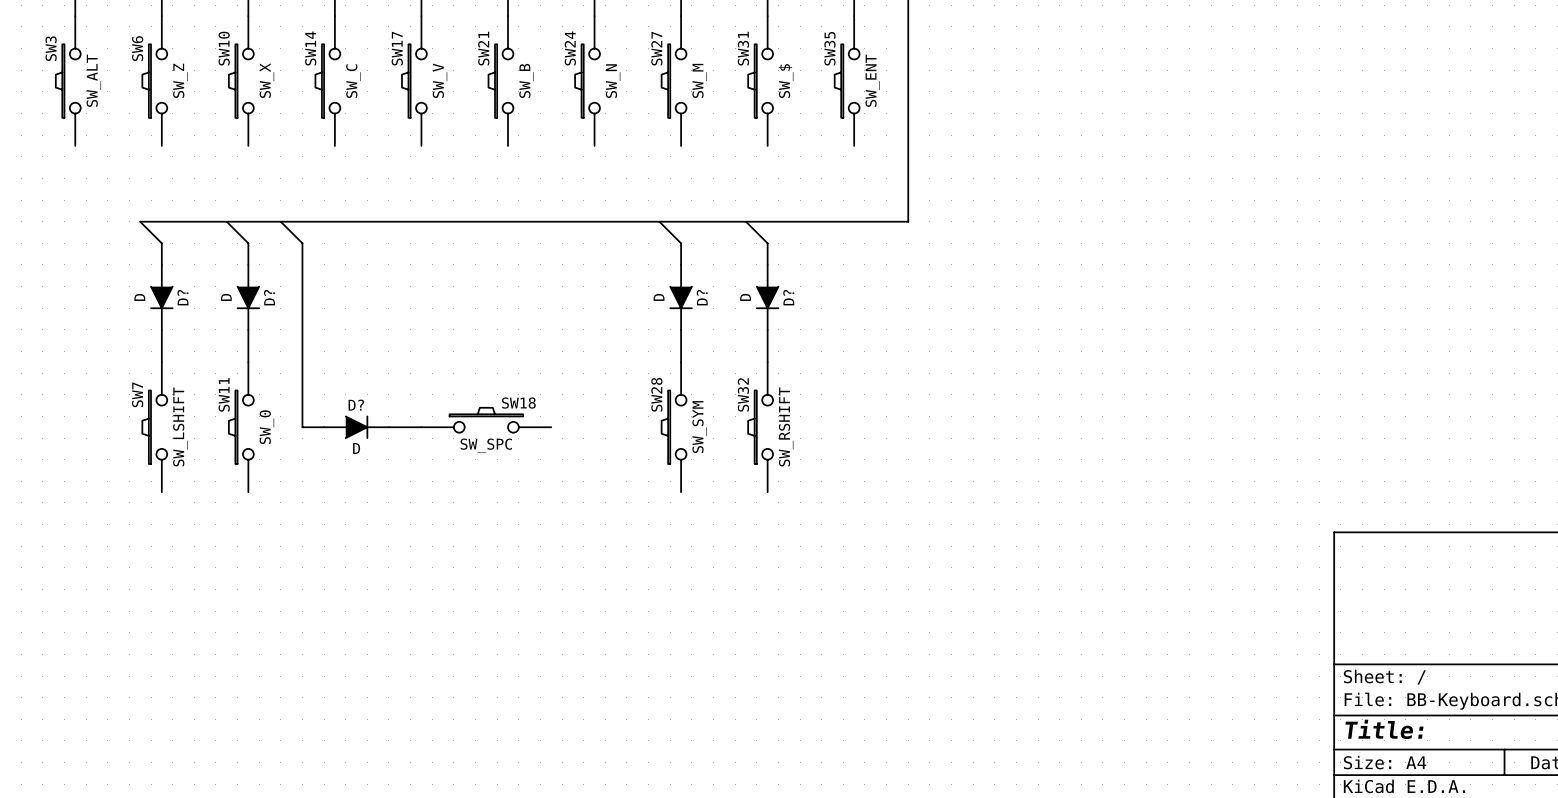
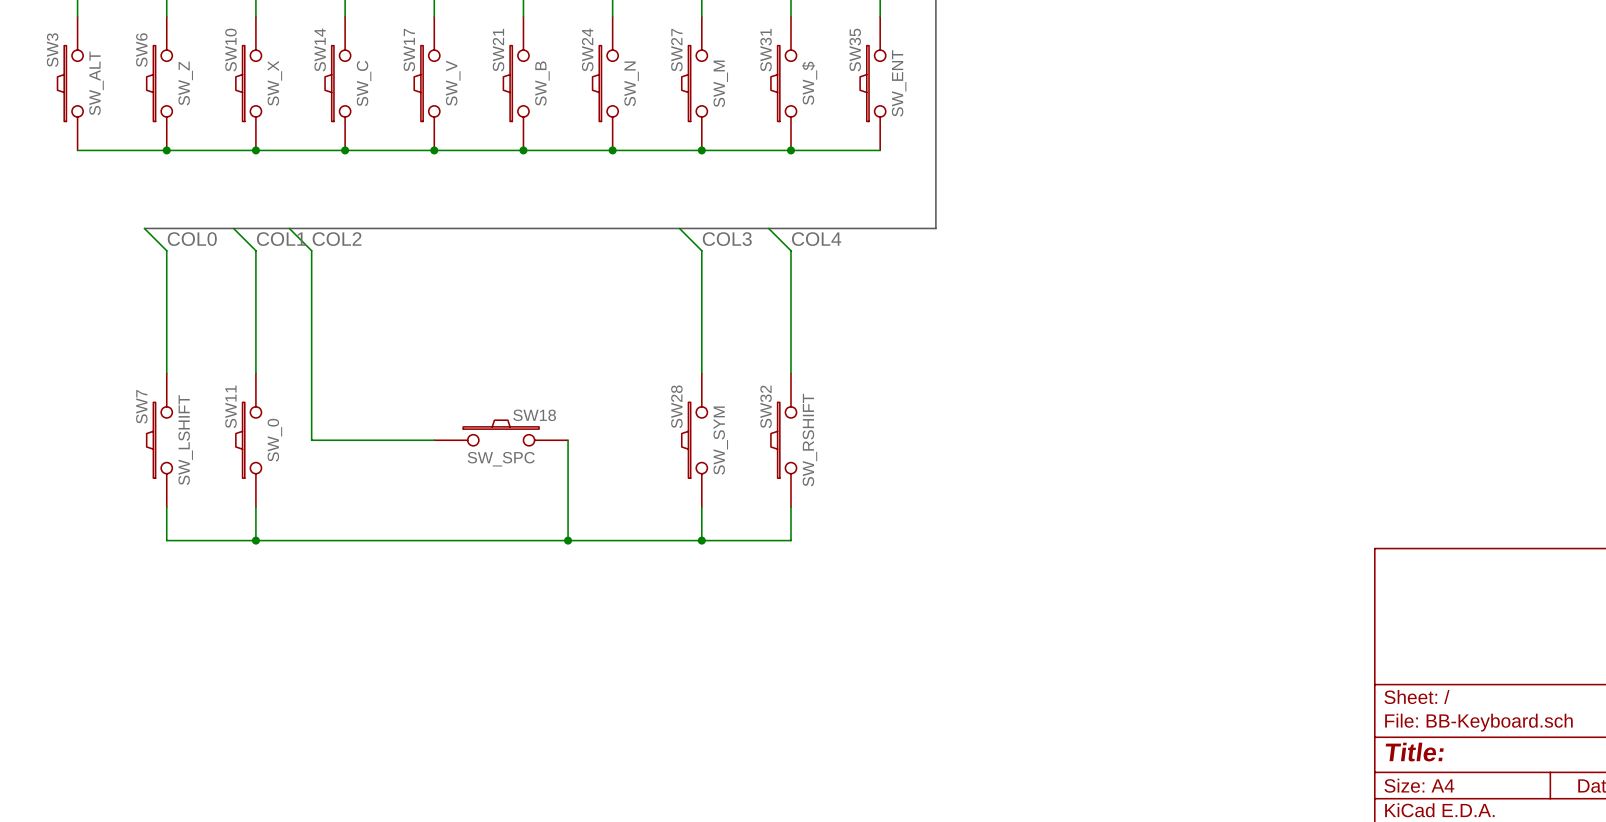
wire: none -> (77, 150) (880, 150)
junction: none -> (166, 150)
junction: none -> (255, 150)
junction: none -> (345, 150)
junction: none -> (434, 150)
junction: none -> (523, 150)
junction: none -> (612, 150)
junction: none -> (701, 150)
junction: none -> (790, 150)
label: none -> COL0 (192, 239)
label: none -> COL1 (281, 239)
label: none -> COL2 (337, 239)
label: none -> COL3 (727, 239)
label: none -> COL4 (816, 239)
D?: D (161, 297) -> none
D?: D (248, 297) -> none
D?: D (681, 297) -> none
D?: D (767, 297) -> none
D?: D (356, 427) -> none
wire: none -> (568, 440) (568, 540)
wire: none -> (166, 507) (166, 540) (790, 540) (790, 507)
wire: none -> (255, 507) (255, 540)
wire: none -> (701, 507) (701, 540)
junction: none -> (255, 540)
junction: none -> (568, 540)
junction: none -> (701, 540)

